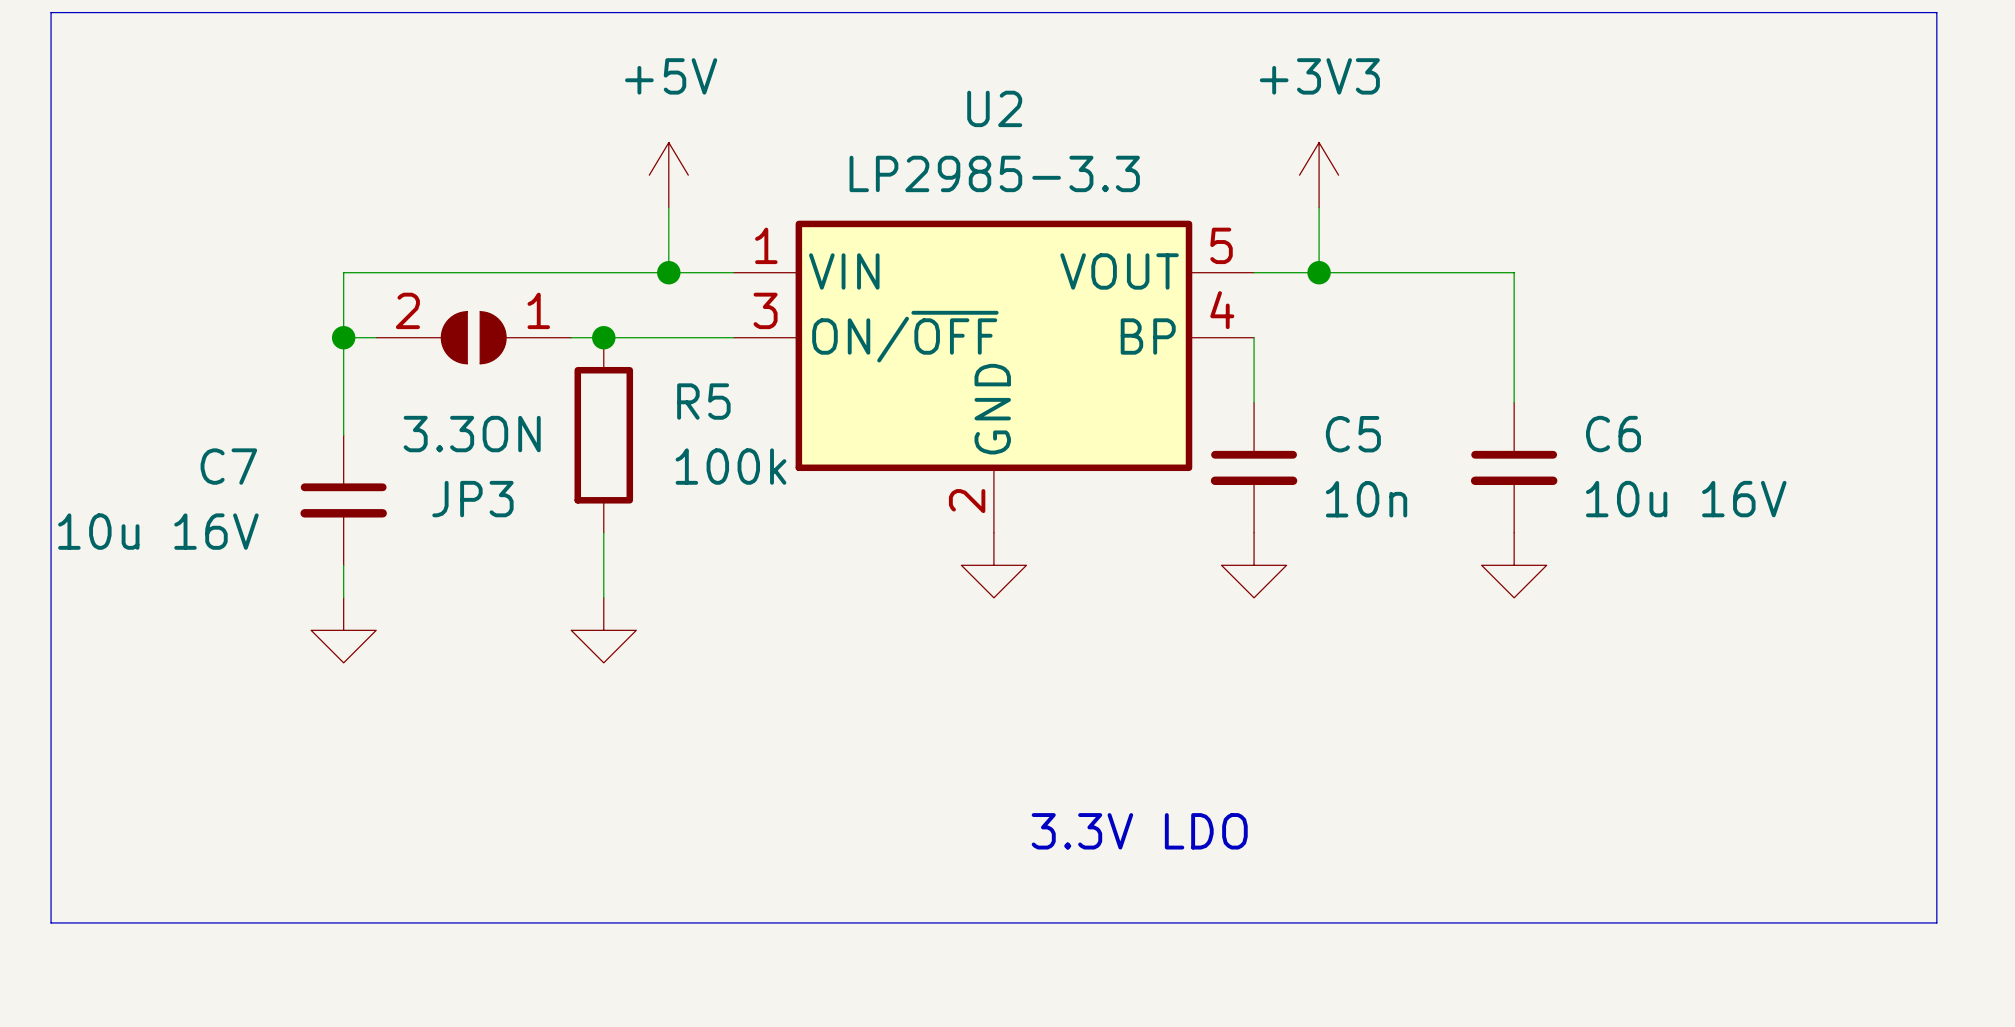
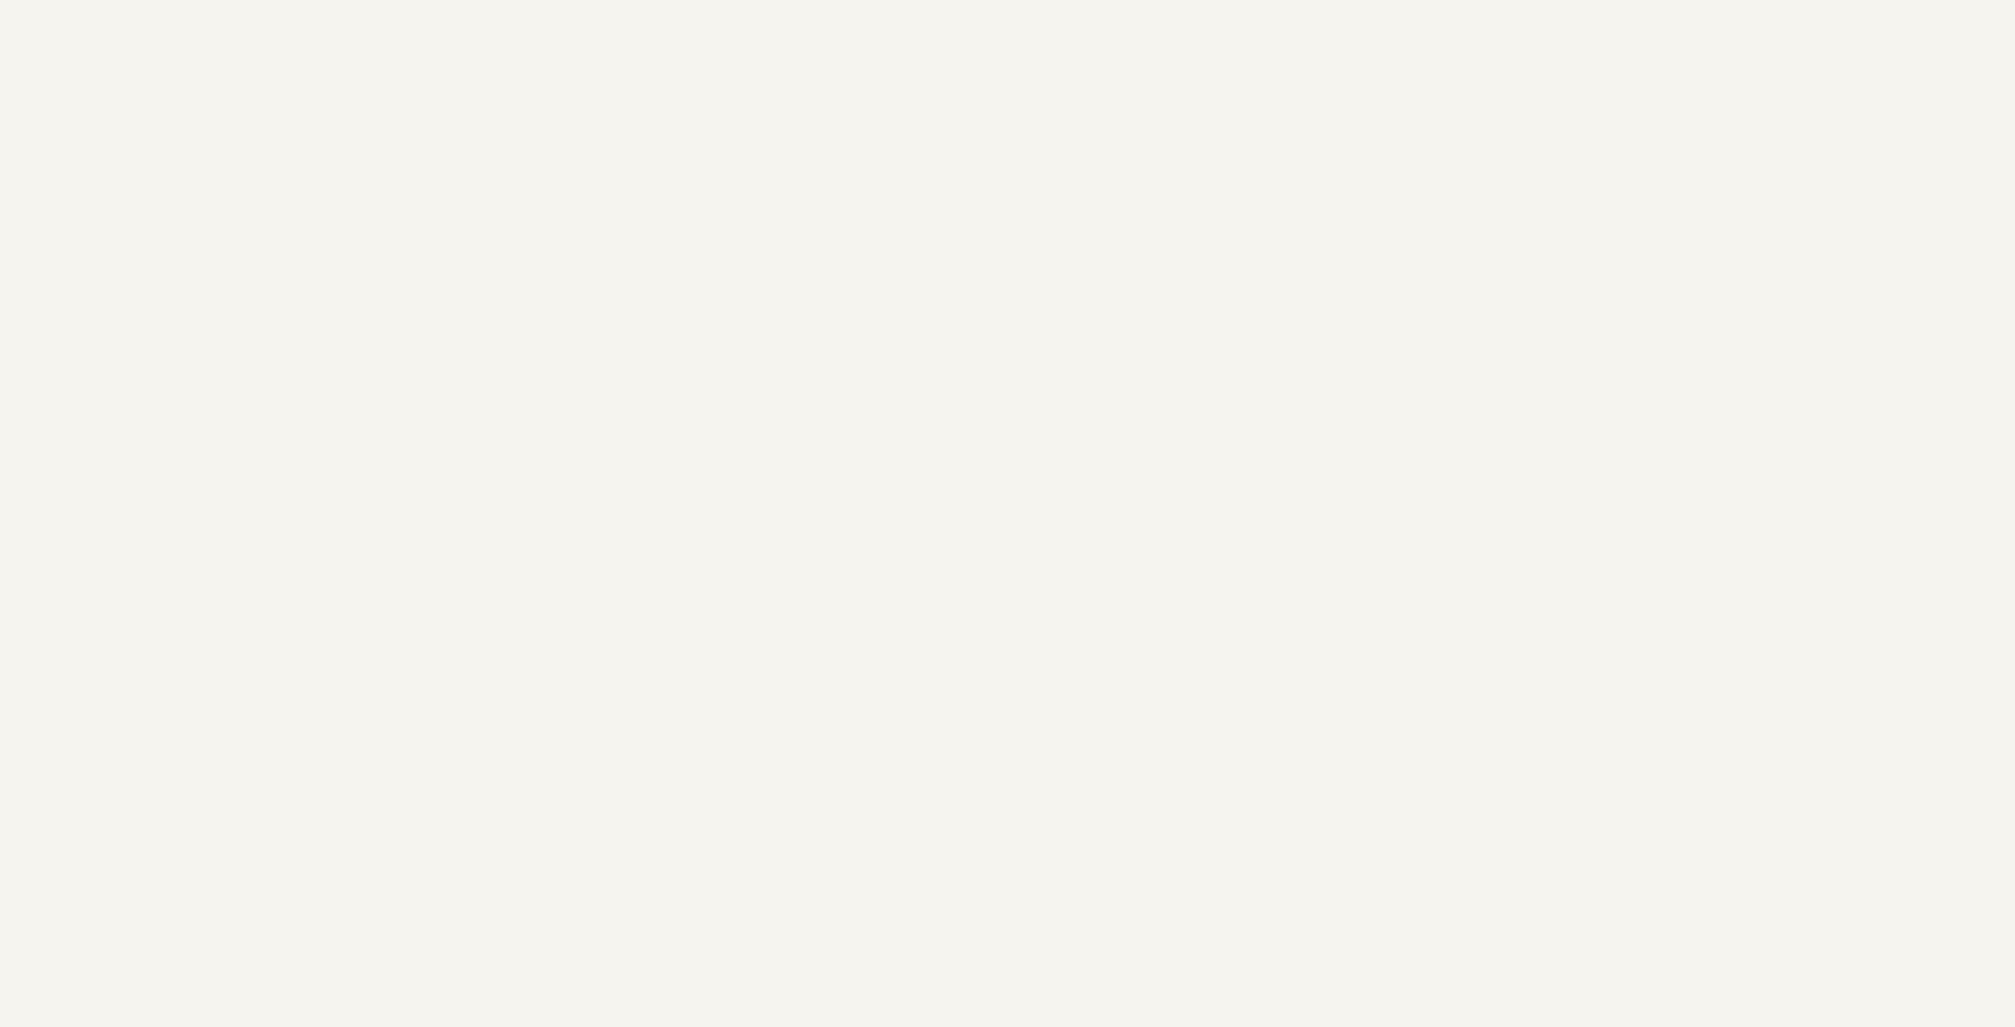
line: (51, 12) (1936, 12) (1936, 922) (51, 922) (51, 12) -> none
power symbol: +5V (668, 175) -> none
power symbol: +3V3 (1319, 175) -> none
wire: (668, 207) (668, 272) -> none
wire: (1319, 207) (1319, 272) -> none
junction: (668, 272) -> none
wire: (733, 272) (343, 272) (343, 435) -> none
wire: (1254, 272) (1514, 272) (1514, 402) -> none
junction: (1319, 272) -> none
wire: (343, 337) (376, 337) -> none
junction: (343, 337) -> none
JP3: 3.3ON (473, 337) -> none
wire: (571, 337) (733, 337) -> none
junction: (603, 337) -> none
wire: (1254, 337) (1254, 402) -> none
U2: LP2985-3.3 (993, 376) -> none
R5: 100k (603, 435) -> none
C5: 10n (1254, 467) -> none
C6: 10u 16V (1514, 467) -> none
C7: 10u 16V (343, 500) -> none
wire: (603, 532) (603, 597) -> none
wire: (343, 565) (343, 597) -> none
power symbol: (993, 565) -> none
power symbol: (1254, 565) -> none
power symbol: (1514, 565) -> none
power symbol: (343, 630) -> none
power symbol: (603, 630) -> none
text: 3.3V LDO (1139, 831) -> none

